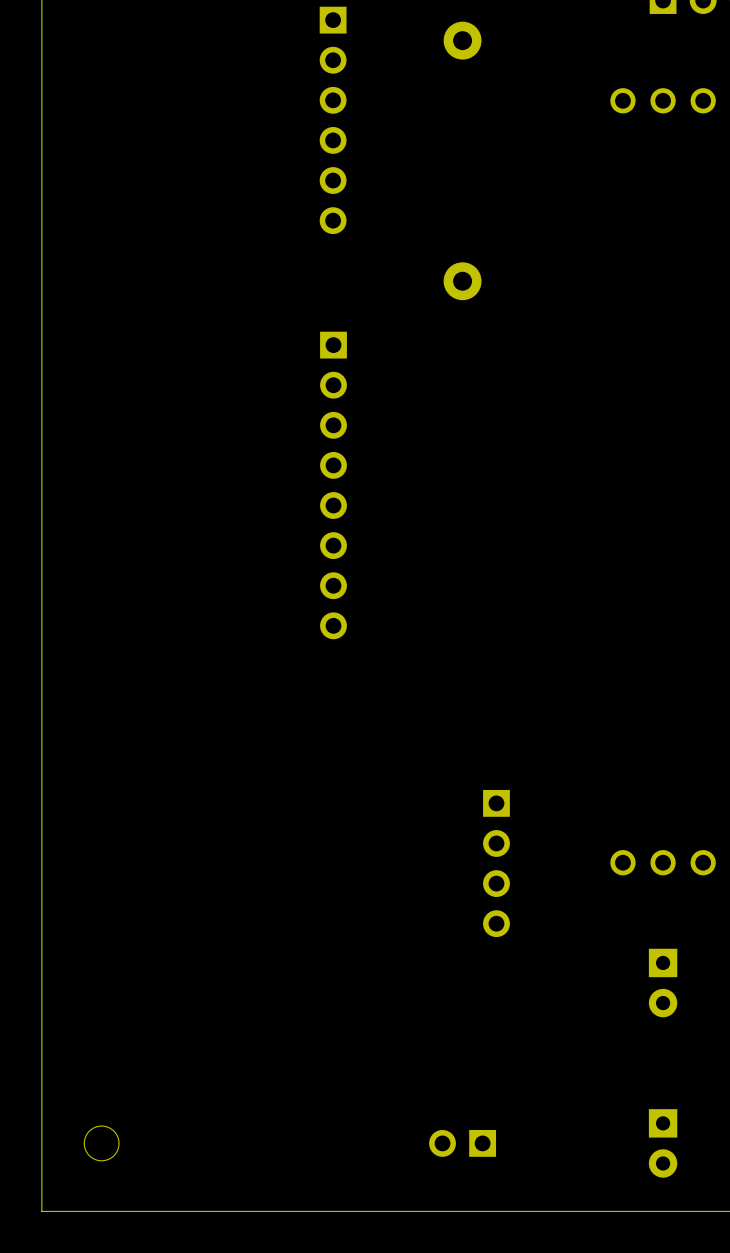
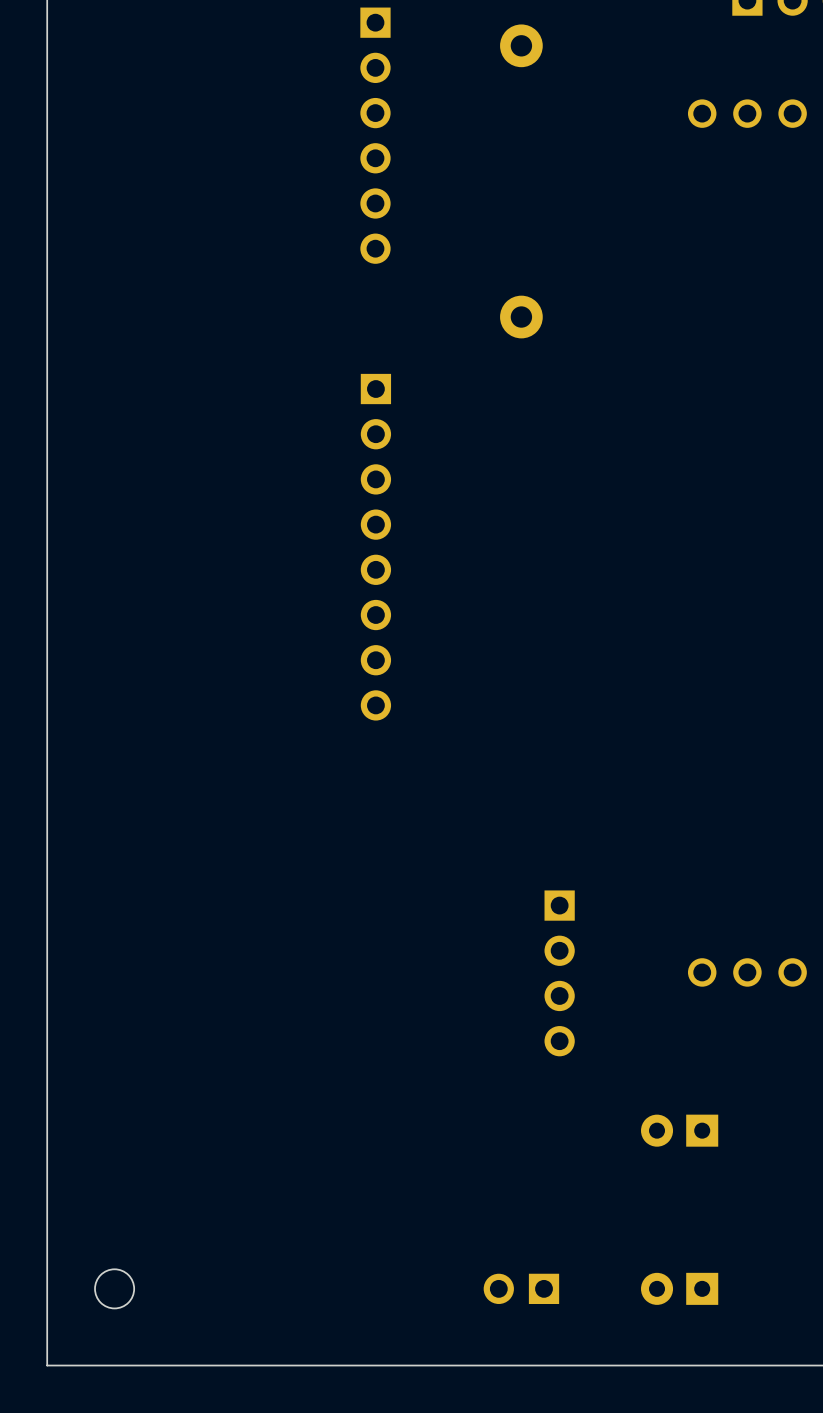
part rotation: 0° (663, 983) -> 90° clockwise (679, 1130)
part position: (663, 983) -> (679, 1130)
part rotation: 0° (663, 1143) -> 90° clockwise (679, 1288)
part position: (663, 1143) -> (679, 1288)

